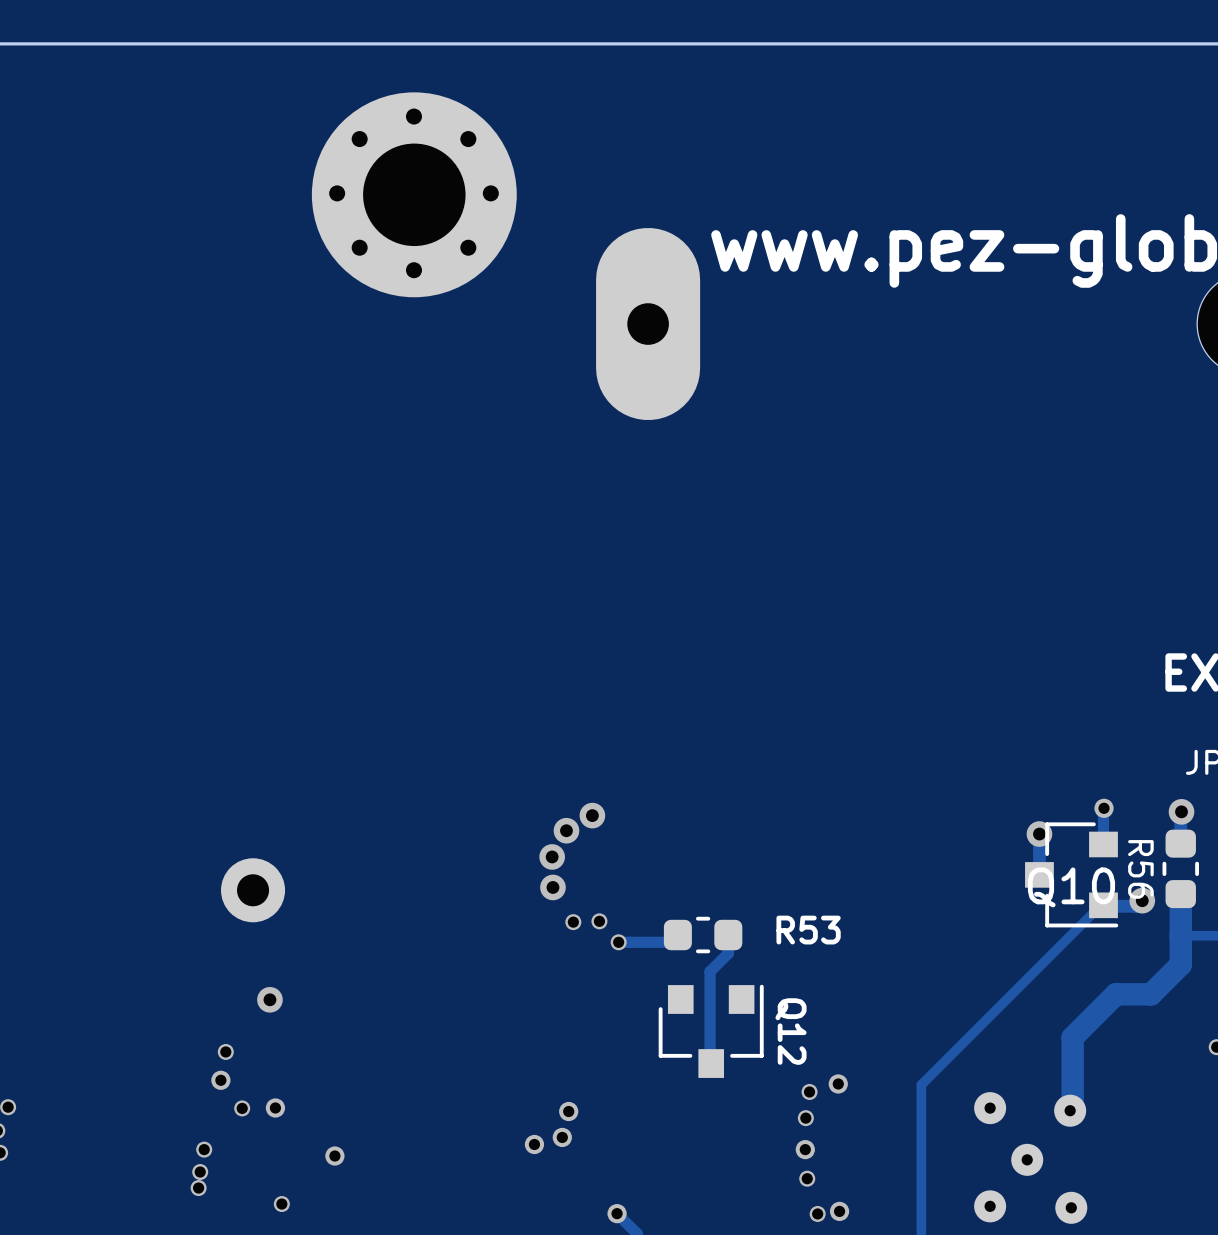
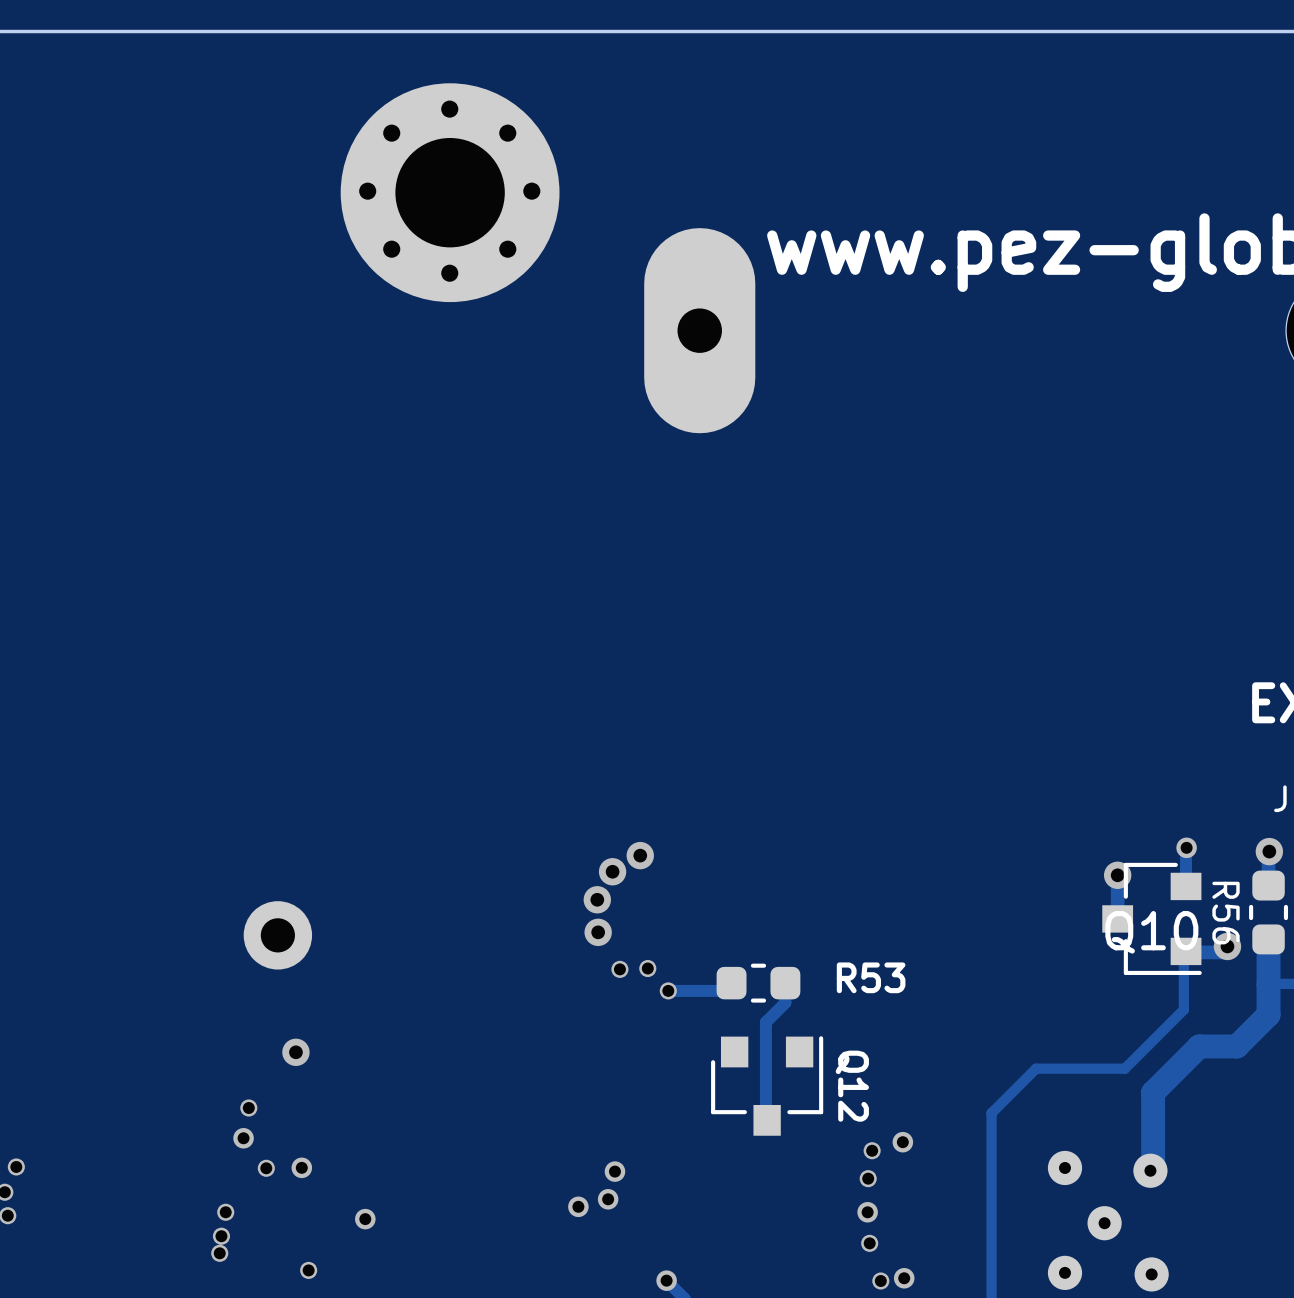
track: (1101, 904) (921, 1084) -> (1183, 950) (1183, 1009) (1124, 1068) (1036, 1068) (991, 1113) (991, 1143)

